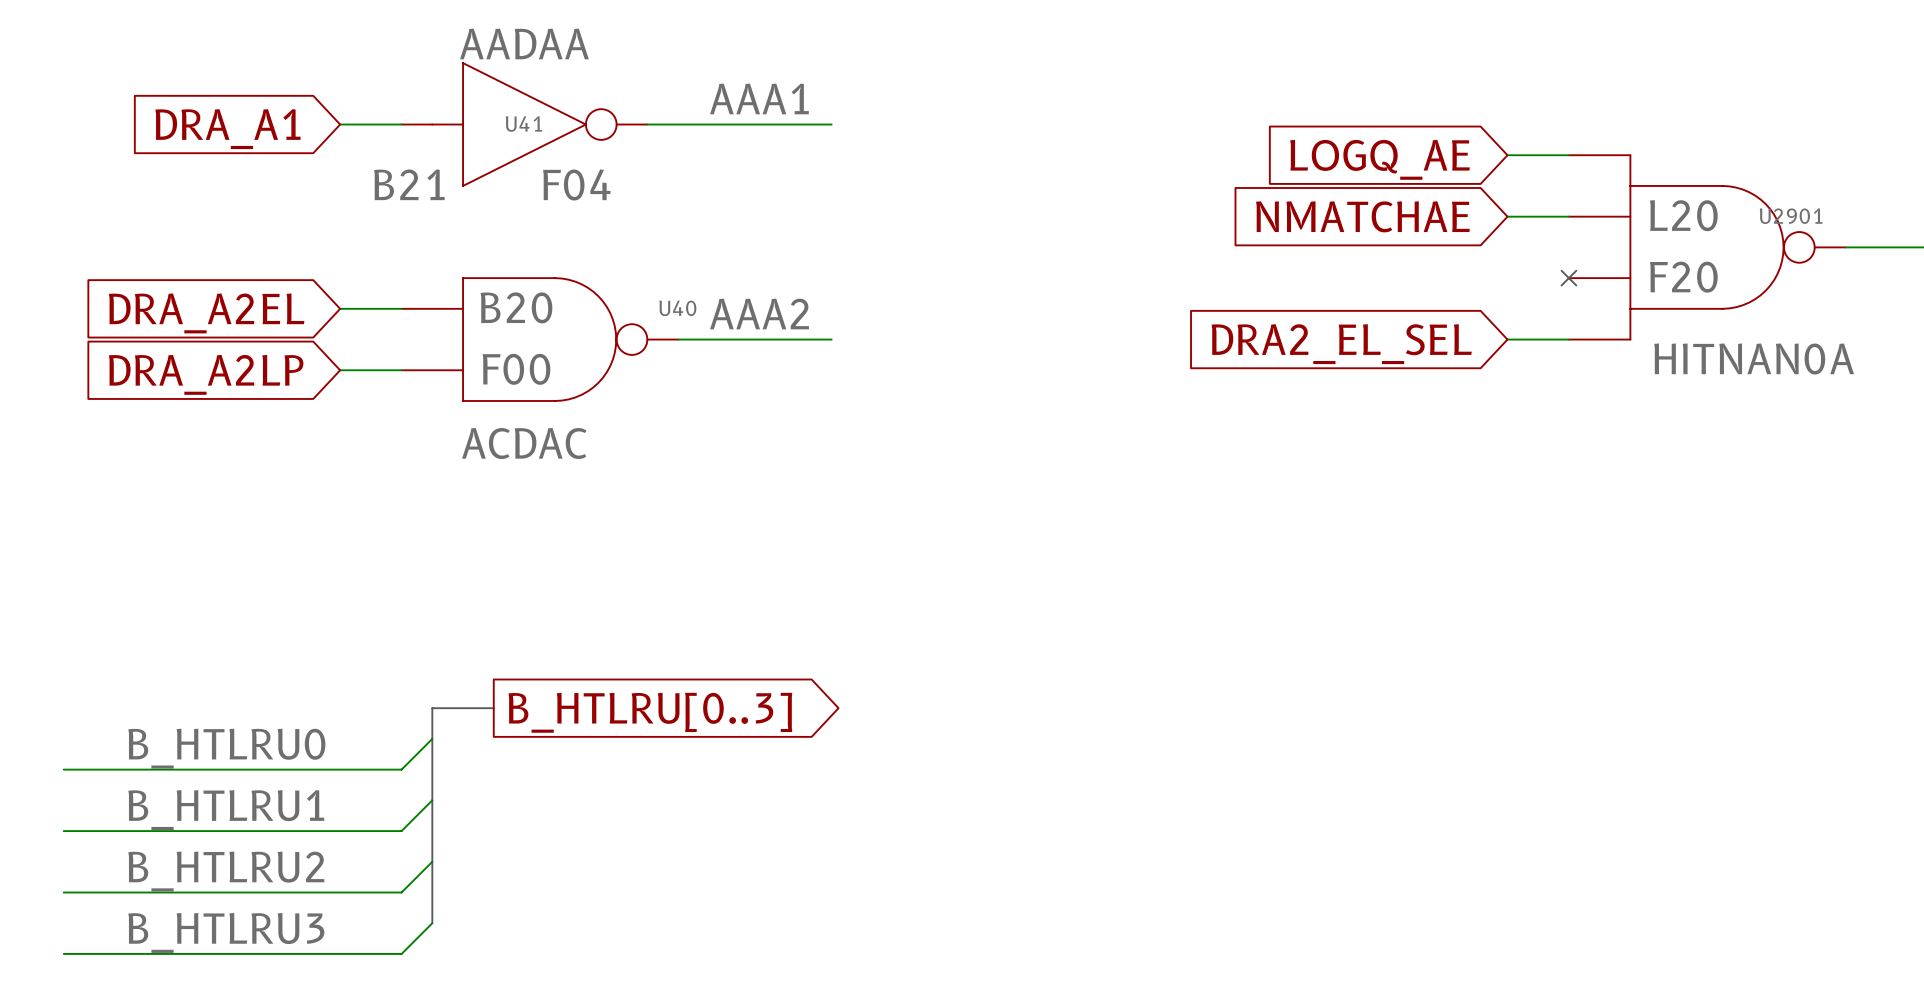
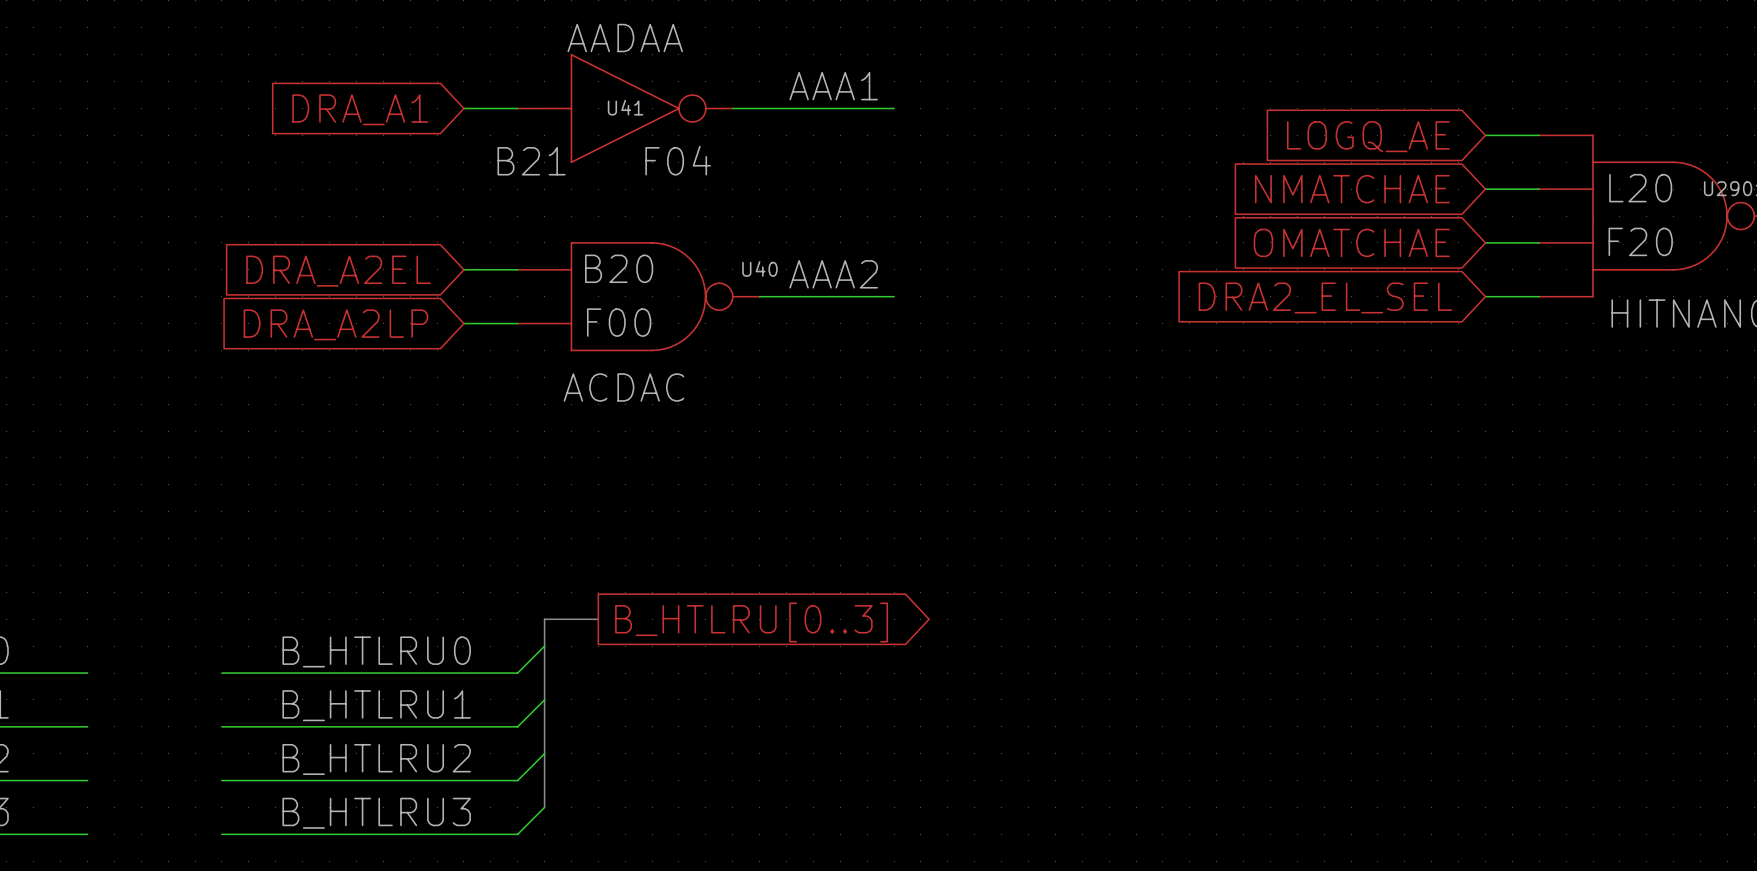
global label: none -> OMATCHAE (1351, 242)
wire: none -> (1485, 242) (1539, 242)
no-connect mark: (1568, 278) -> none

